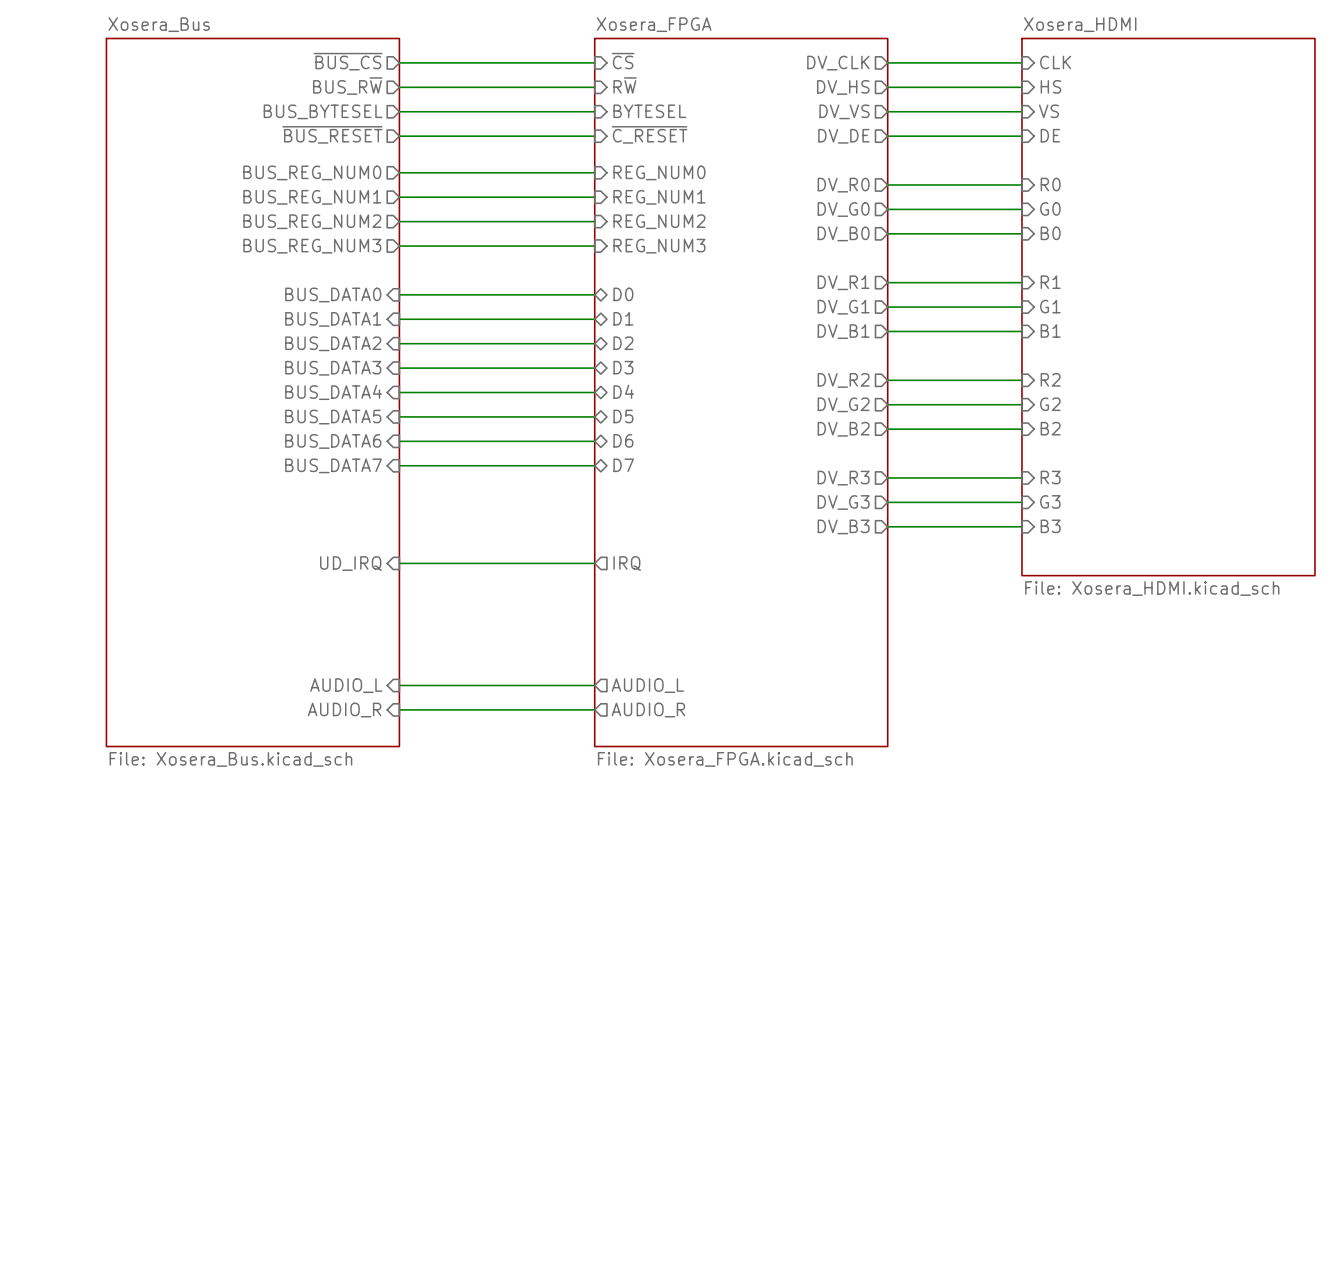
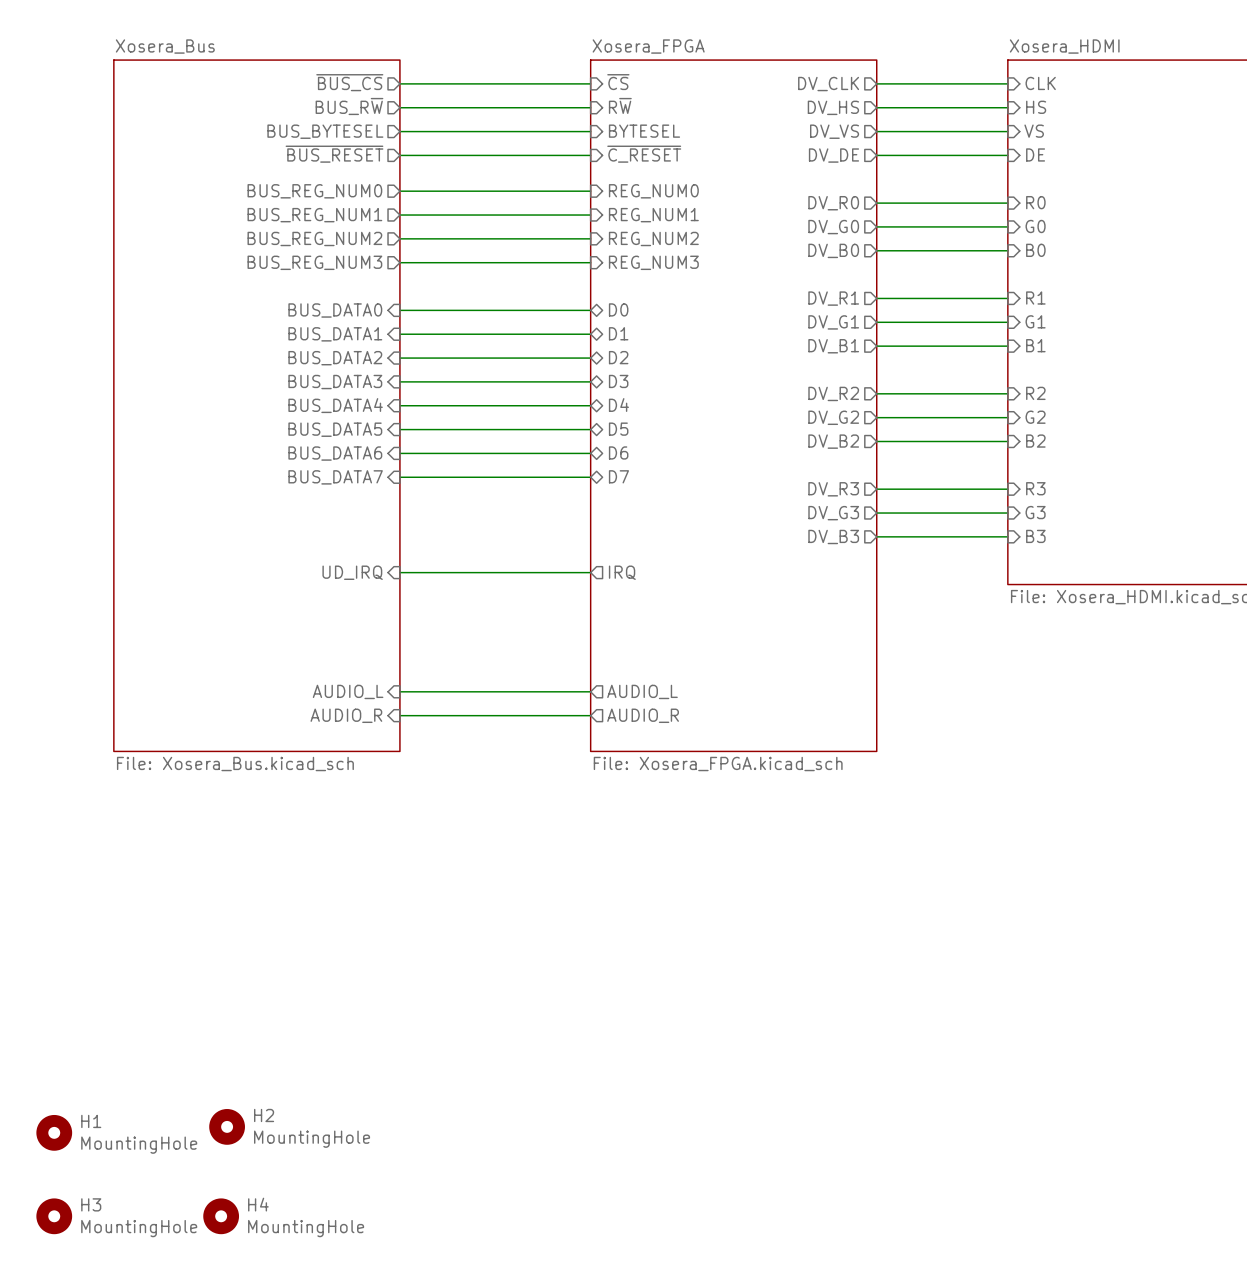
H2: none -> MountingHole (227, 1126)
H1: none -> MountingHole (54, 1132)
H3: none -> MountingHole (54, 1216)
H4: none -> MountingHole (221, 1216)

